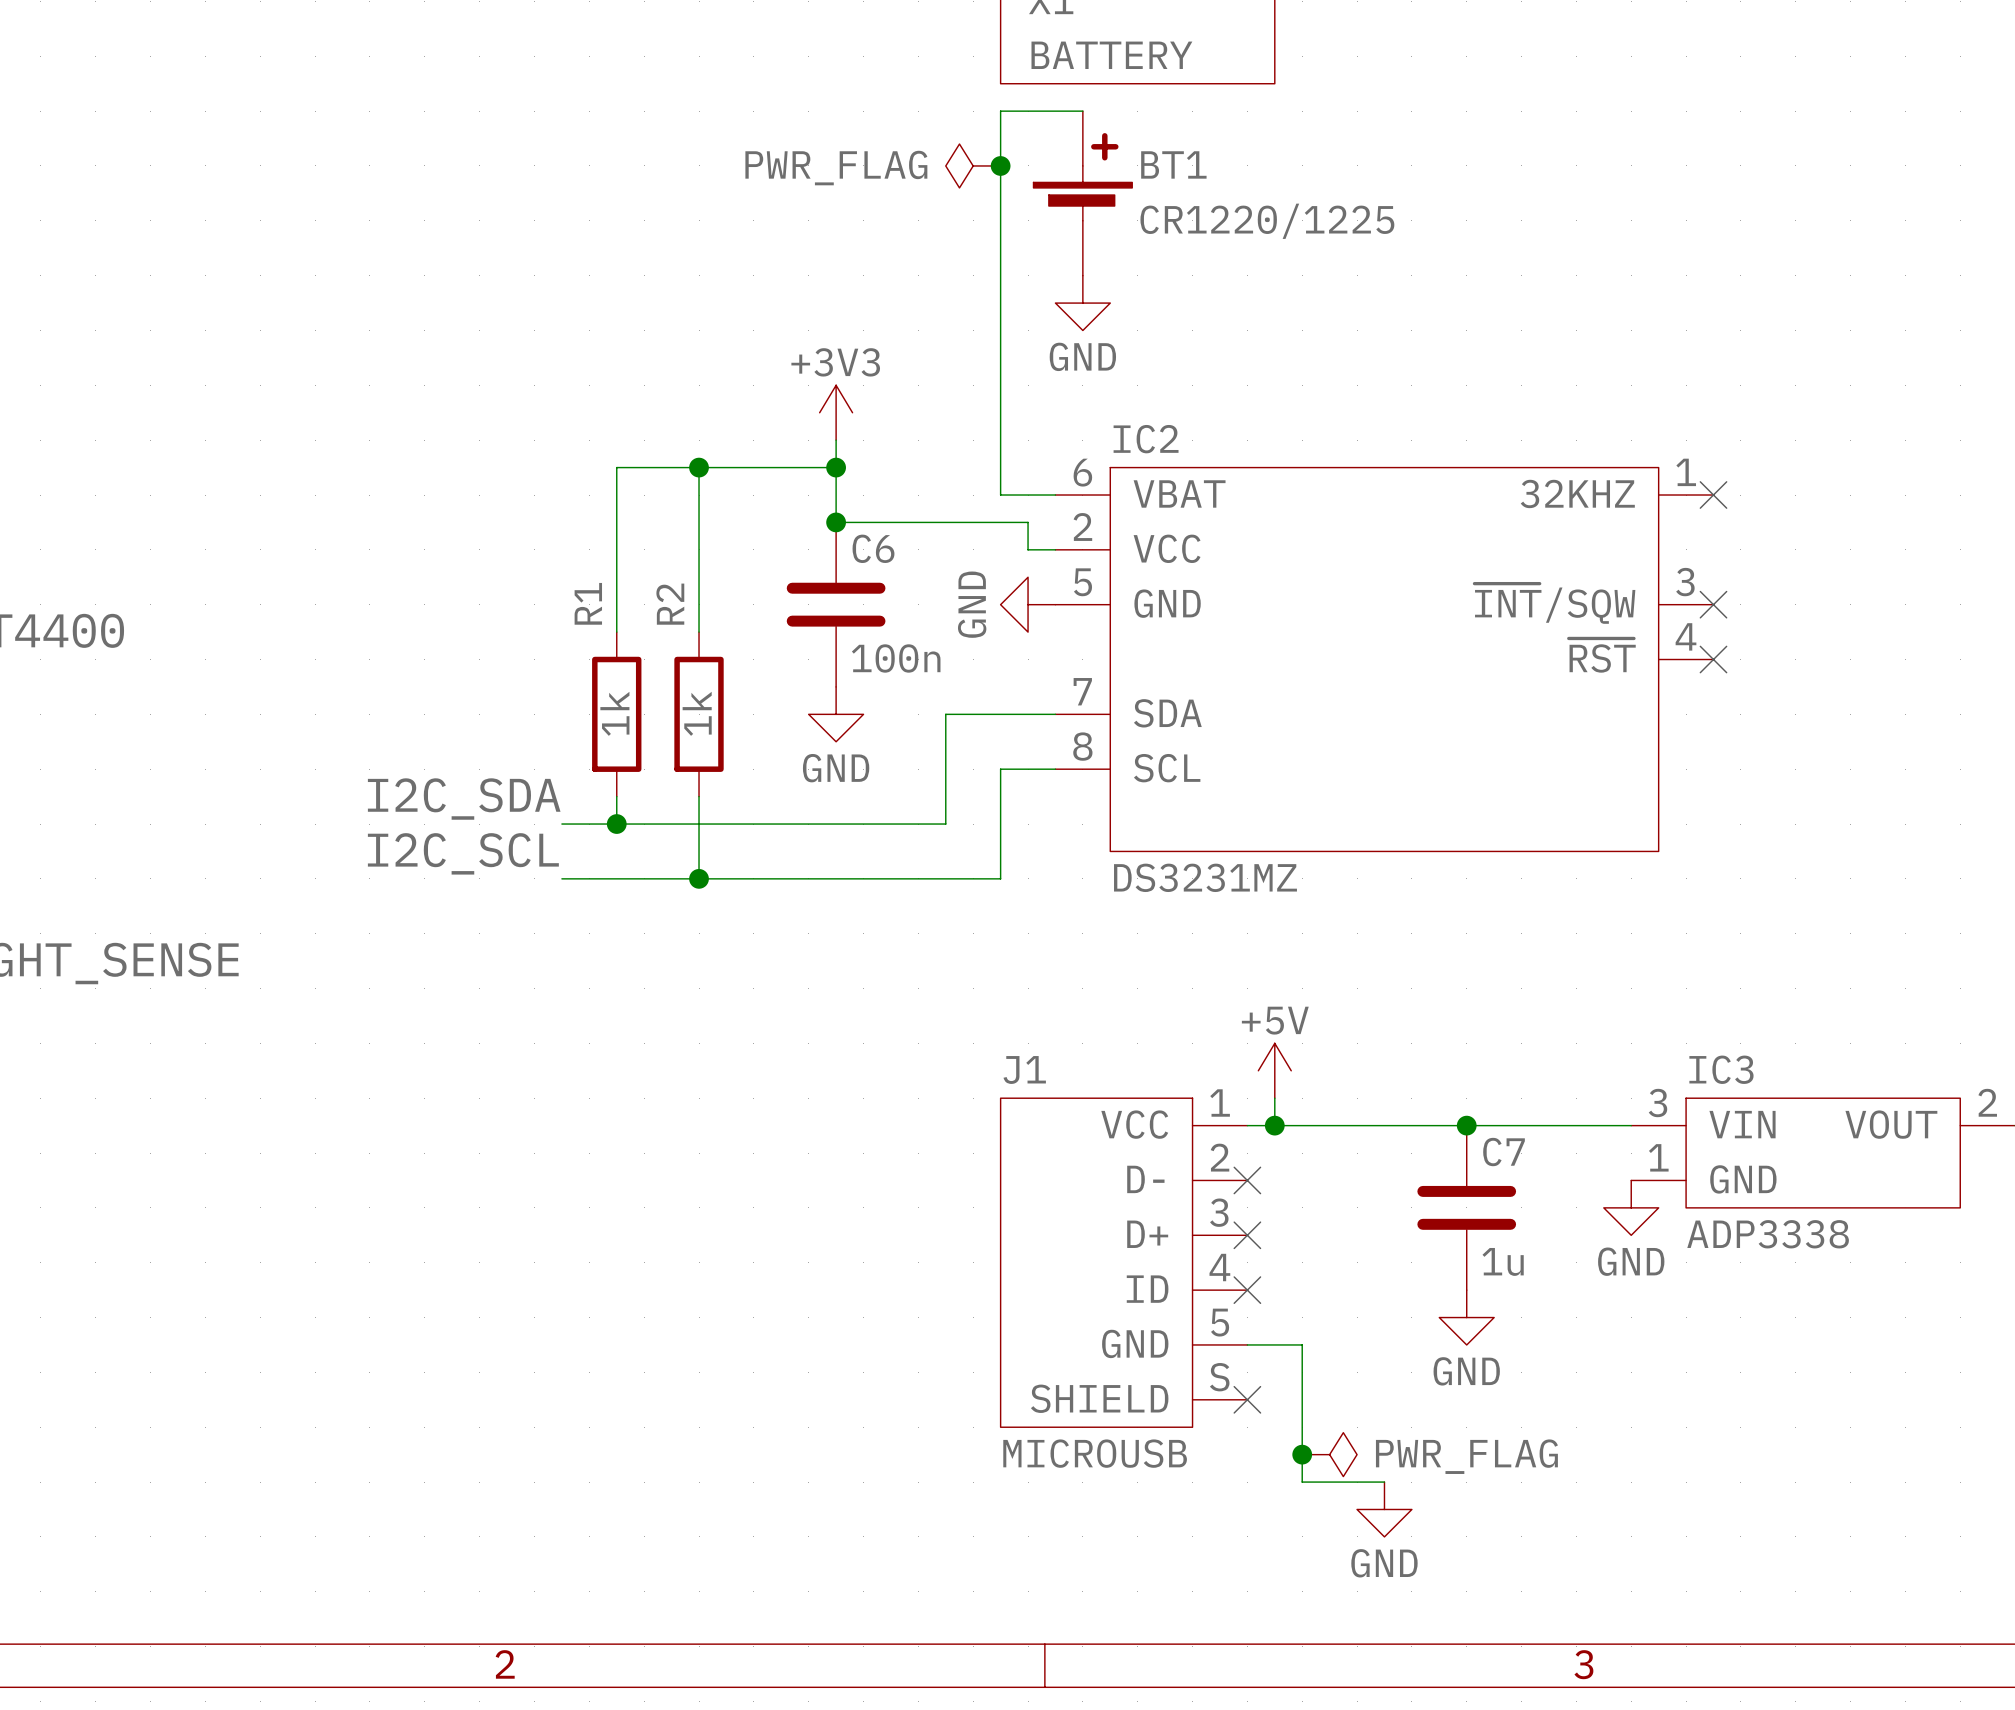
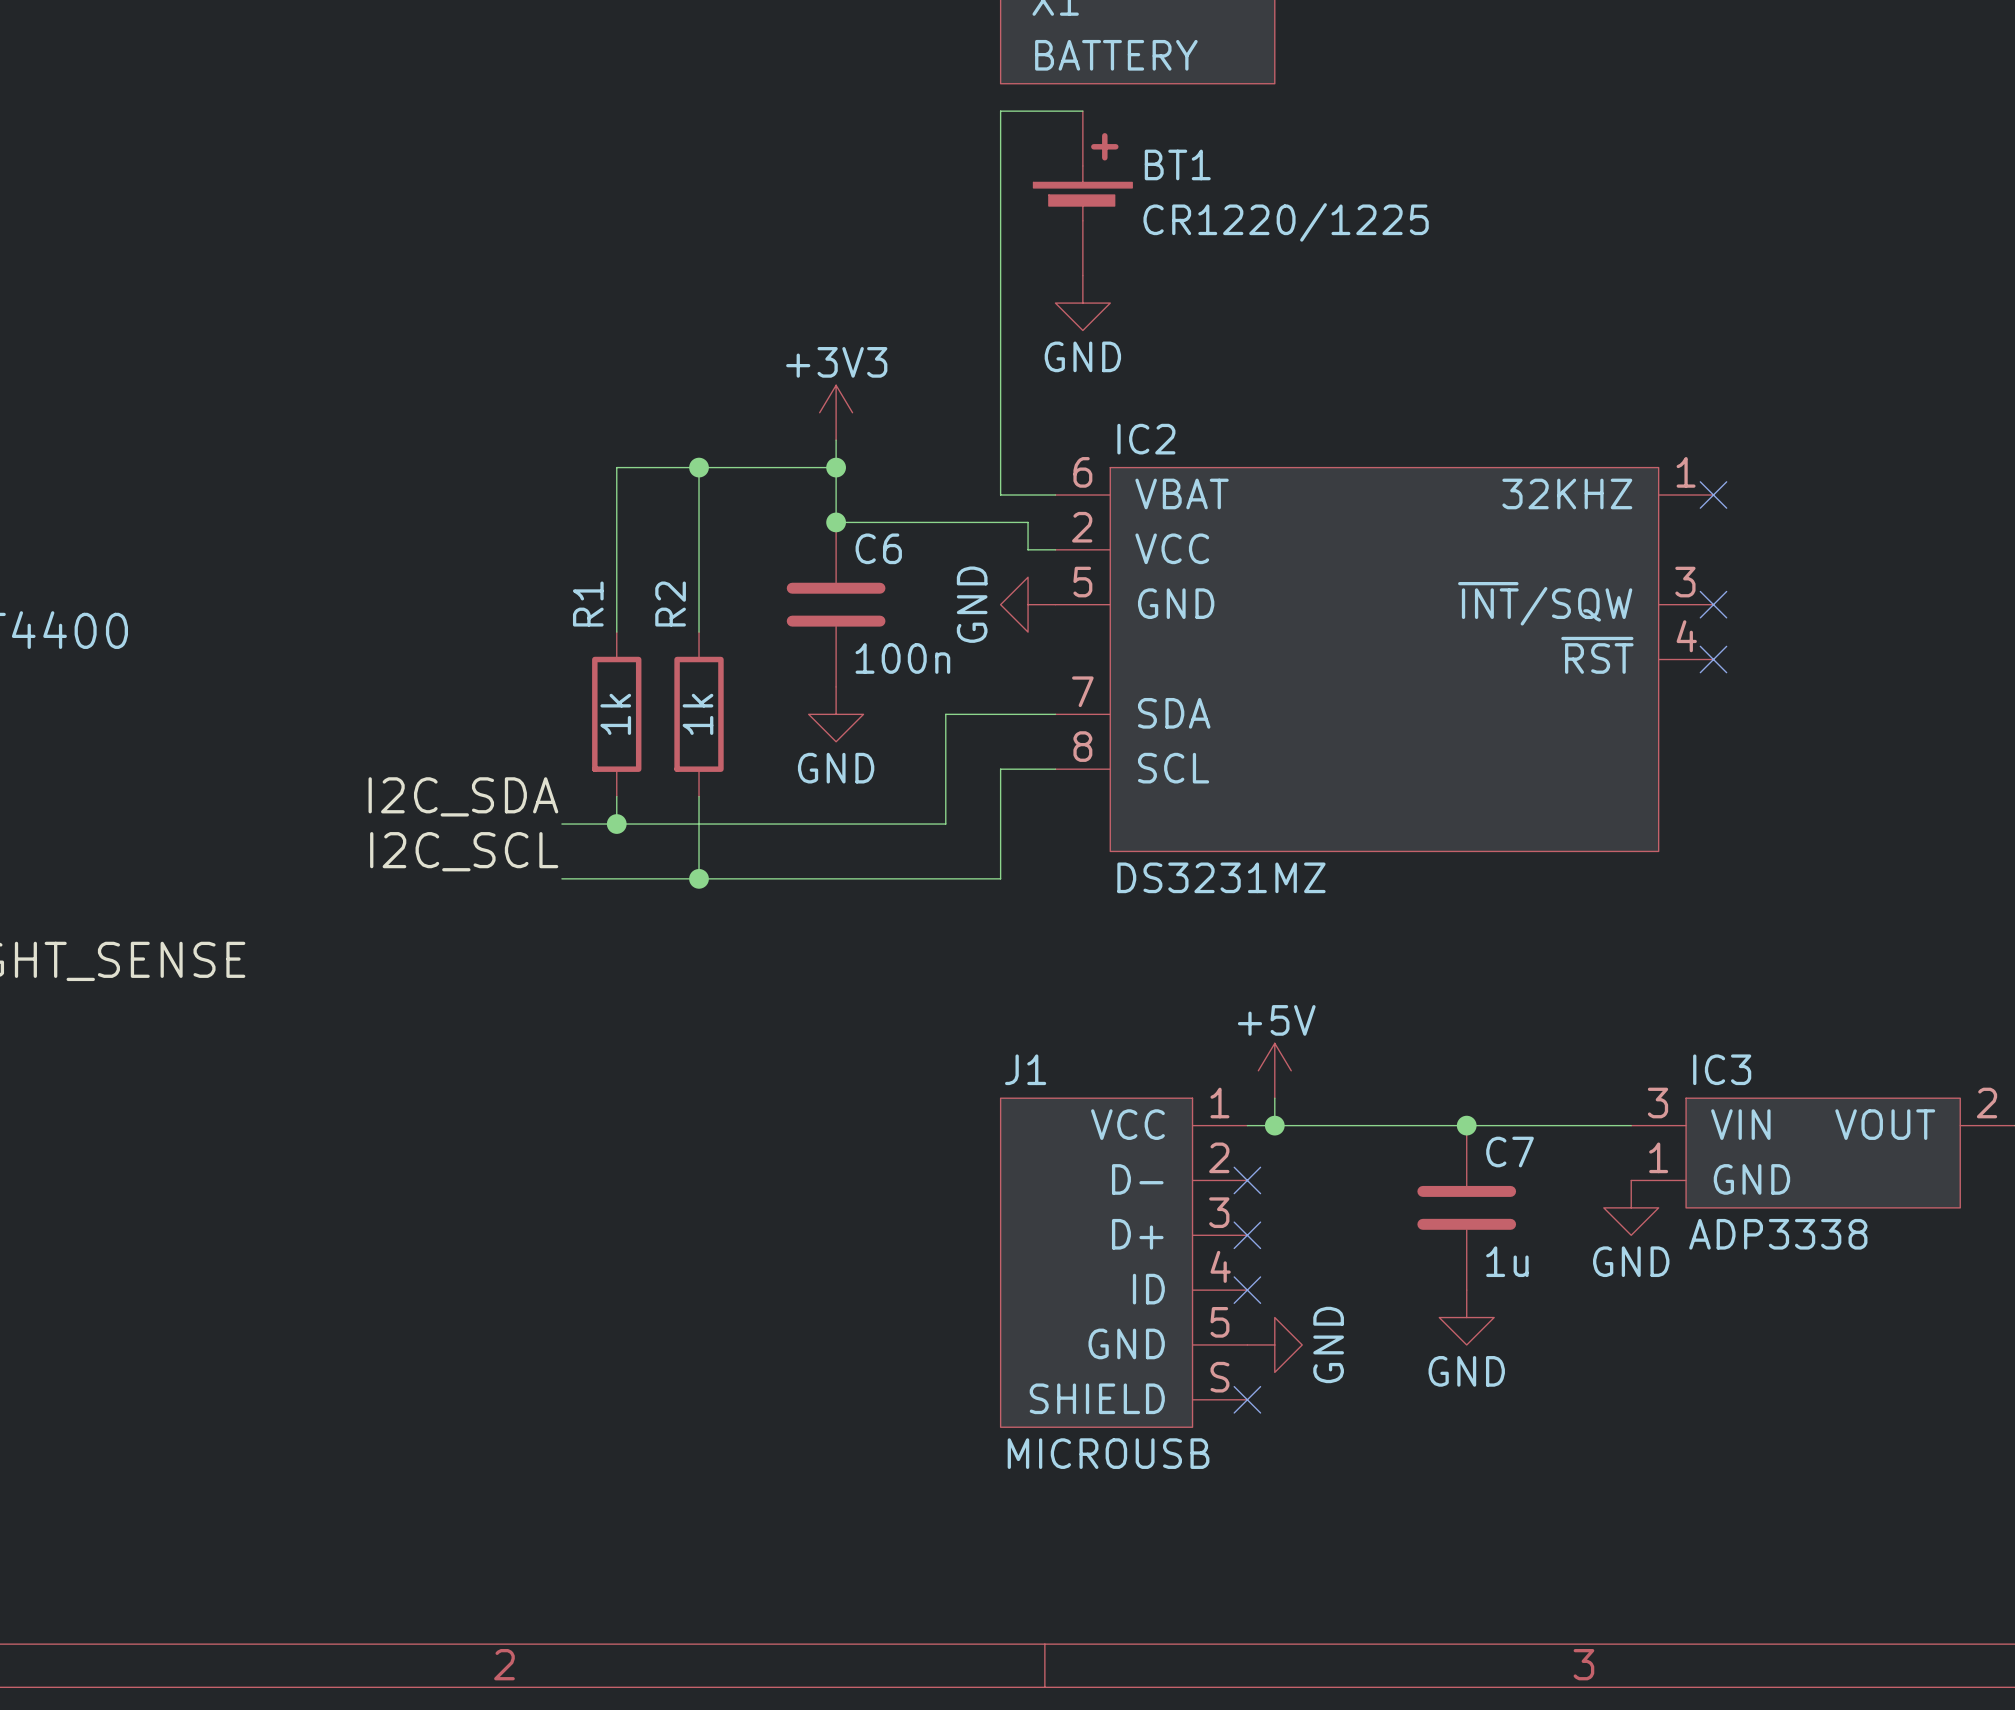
power symbol: PWR_FLAG (973, 165) -> none
junction: (1000, 165) -> none
wire: (1247, 1344) (1302, 1344) (1302, 1482) (1384, 1482) -> none
junction: (1302, 1454) -> none
power symbol: PWR_FLAG (1329, 1454) -> none
power symbol rotation: 0° (1384, 1509) -> 90° counterclockwise (1274, 1344)
power symbol position: GND (1384, 1509) -> GND (1274, 1344)

